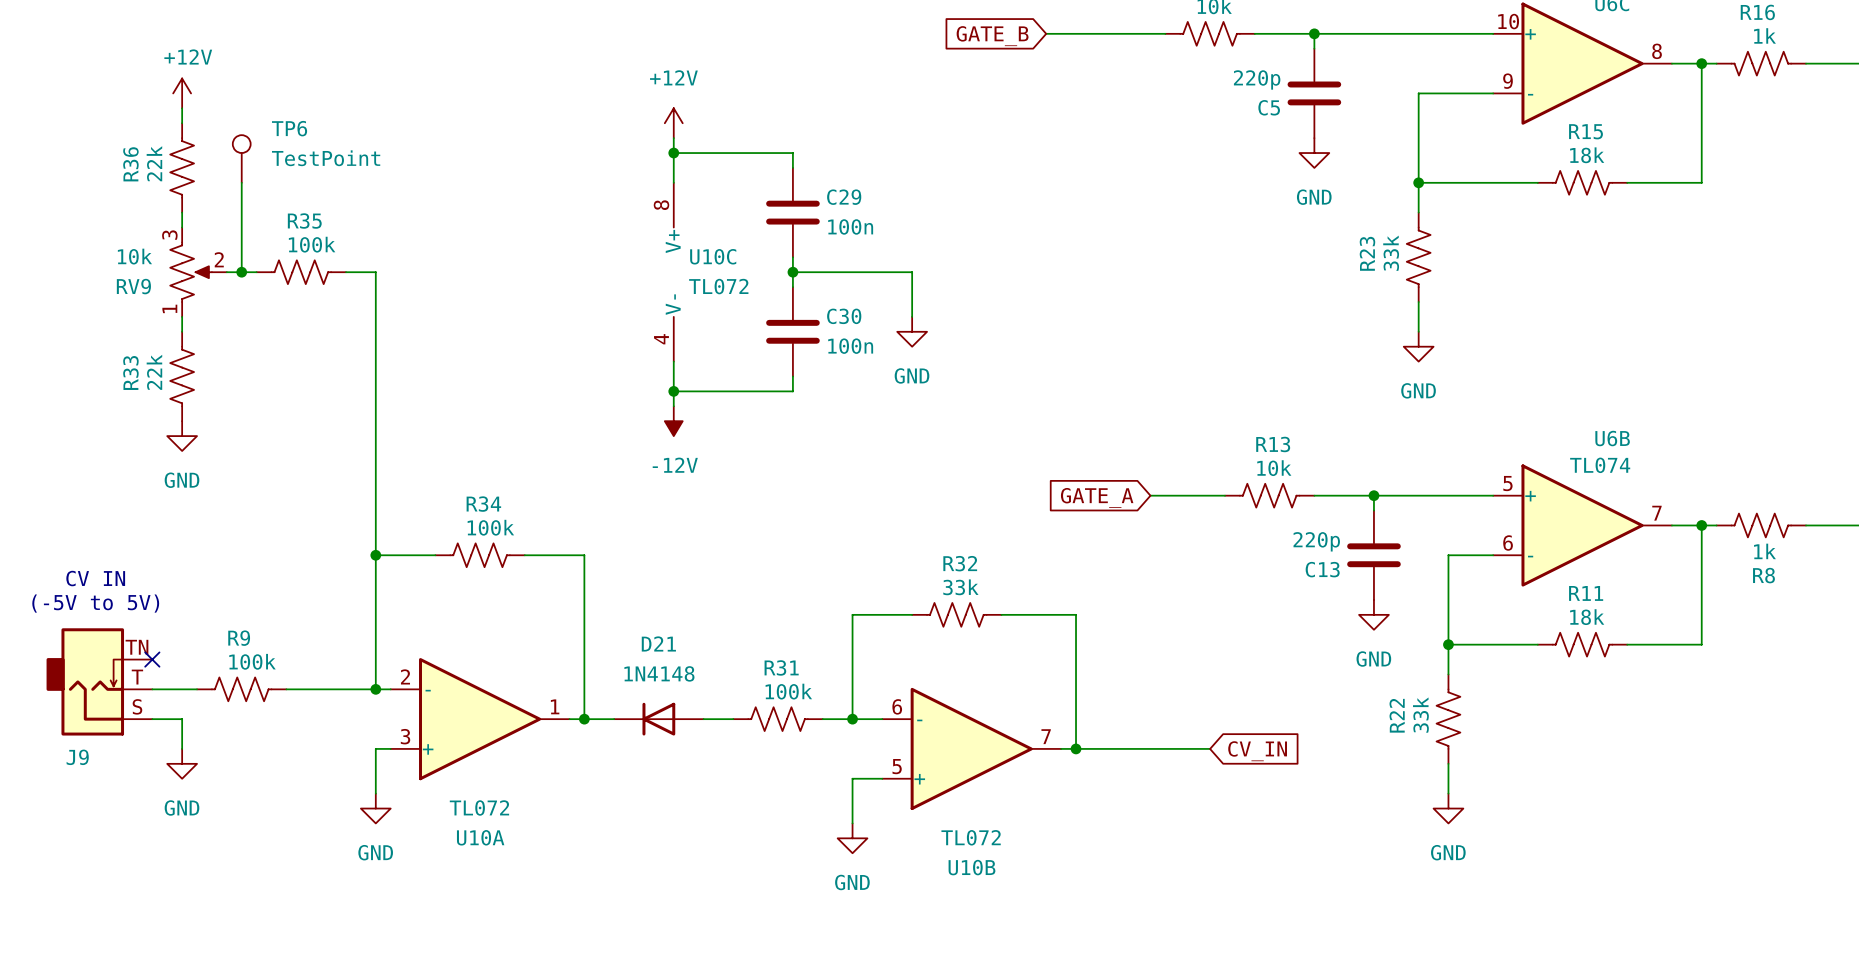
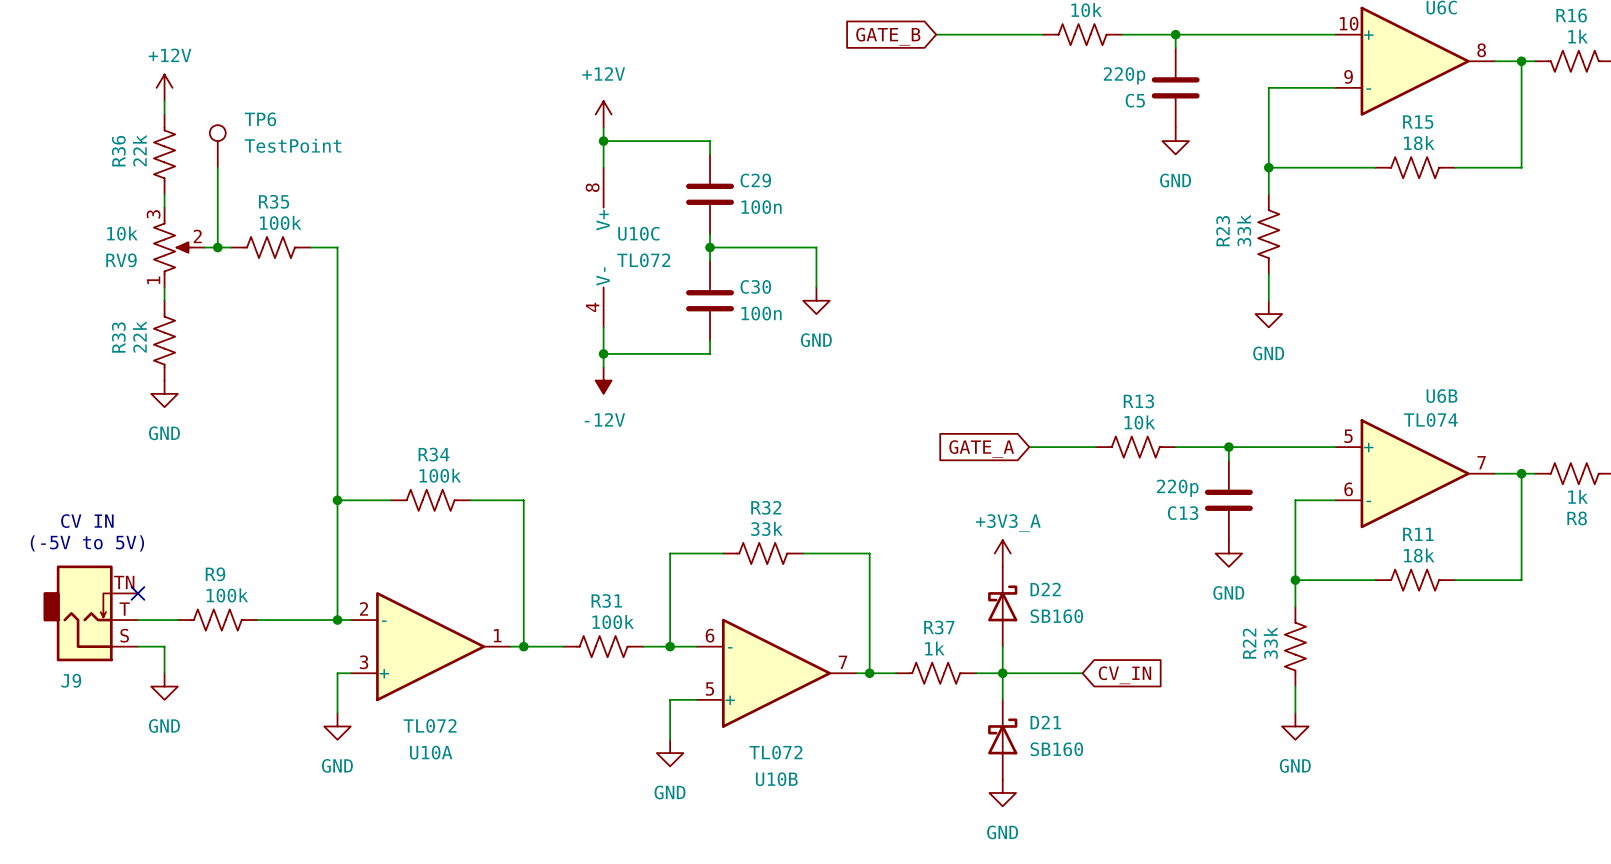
wire: none -> (723, 553) (670, 553) (670, 646)
wire: (897, 614) (852, 614) (852, 719) -> none
wire: none -> (816, 553) (869, 553) (869, 673)
R32 position: (956, 614) -> (763, 553)
wire: (1001, 614) (1076, 614) (1076, 748) -> none
power symbol: none -> +3V3_A (1002, 553)
D21 name position: D21 (658, 643) -> D21 (1045, 722)
D21 value: 1N4148 (659, 673) -> SB160 (1056, 749)
D22: none -> SB160 (1002, 606)
D21 symbol: [614, 702, 704, 736] -> [988, 699, 1018, 780]
junction: none -> (670, 646)
R31 position: (778, 719) -> (603, 646)
junction: (852, 719) -> none
wire: none -> (1002, 646) (1002, 699)
junction: none -> (869, 673)
U10B position: (971, 748) -> (776, 673)
R37: none -> 1k (936, 673)
junction position: (1076, 748) -> (1002, 673)
wire: (882, 778) (852, 778) (852, 823) -> (696, 699) (670, 699) (670, 739)
power symbol position: GND (852, 838) -> GND (670, 753)
power symbol: none -> GND (1002, 792)

